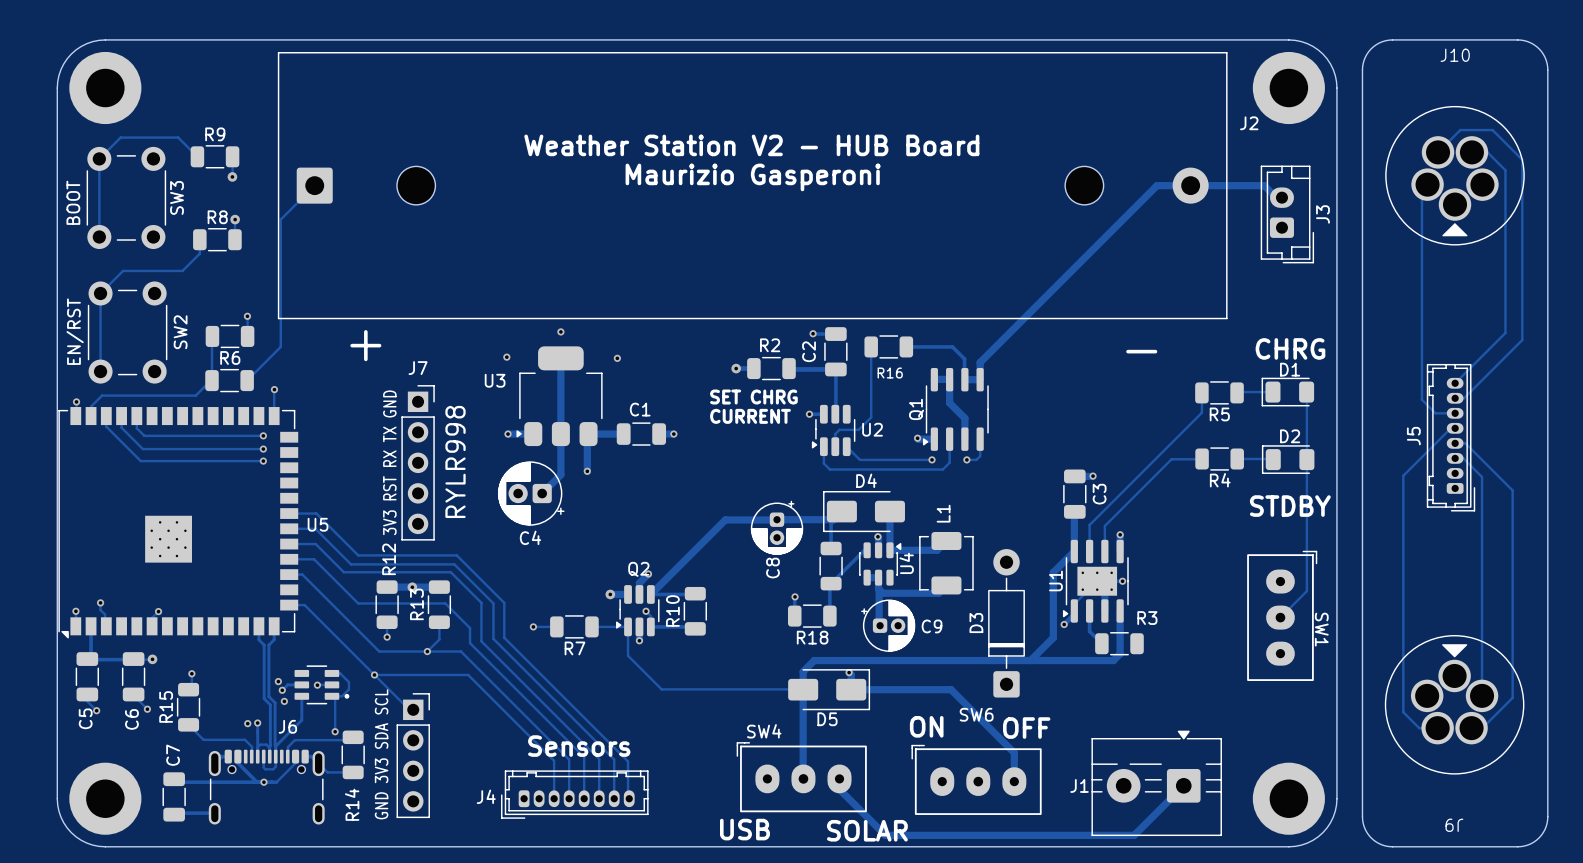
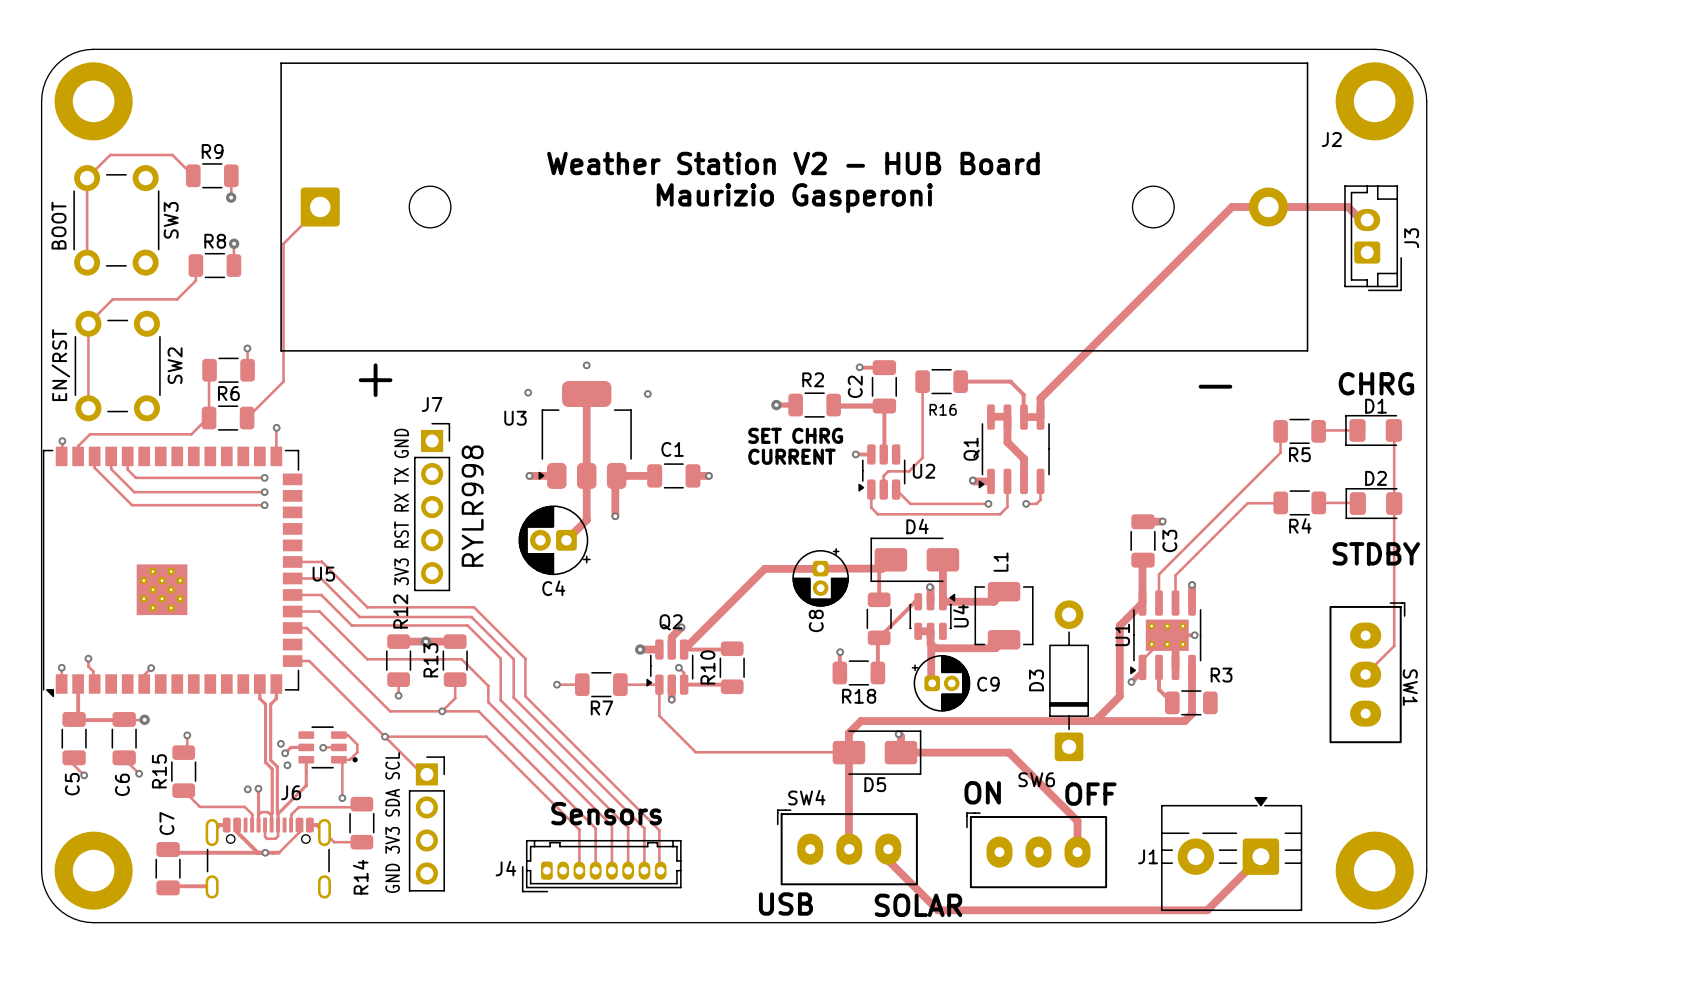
board edge: (1392, 39) (1524, 40) (1539, 48) (1544, 56) (1547, 66) (1547, 816) (1544, 829) (1539, 837) (1530, 843) (1521, 846) (1389, 846) (1379, 843) (1371, 837) (1365, 829) (1362, 820) (1362, 69) (1365, 56) (1371, 48) (1382, 41) (1392, 39) -> none
track: (1438, 152) (1460, 130) (1492, 130) (1522, 159) (1522, 340) (1464, 398) (1455, 398) -> none
track: (1471, 152) (1487, 152) (1505, 170) (1505, 332) (1455, 383) -> none
J10: (1455, 175) -> none
track: (1427, 184) (1421, 190) (1421, 399) (1435, 413) (1455, 413) -> none
track: (1455, 428) (1450, 428) (1403, 475) (1403, 712) (1419, 728) (1437, 728) -> none
J5: (1451, 437) -> none
track: (1455, 443) (1465, 443) (1512, 490) (1512, 697) (1482, 728) (1471, 728) -> none
track: (1455, 458) (1463, 458) (1482, 477) (1482, 695) -> none
J9: (1454, 704) -> none

